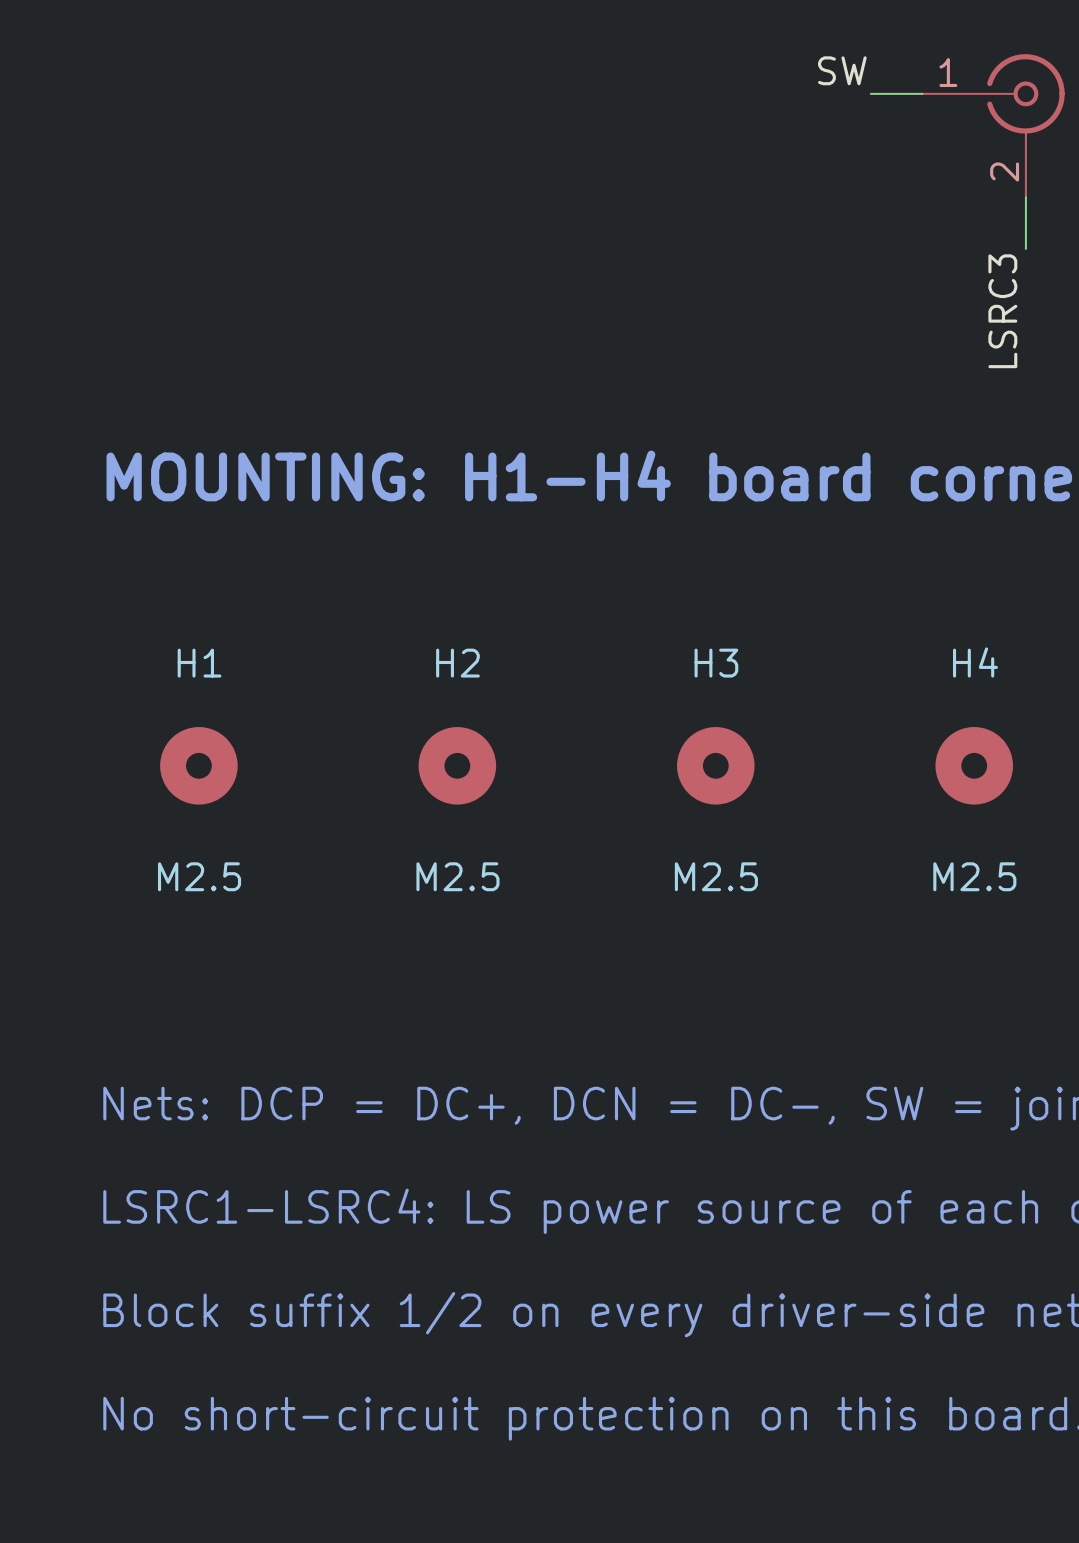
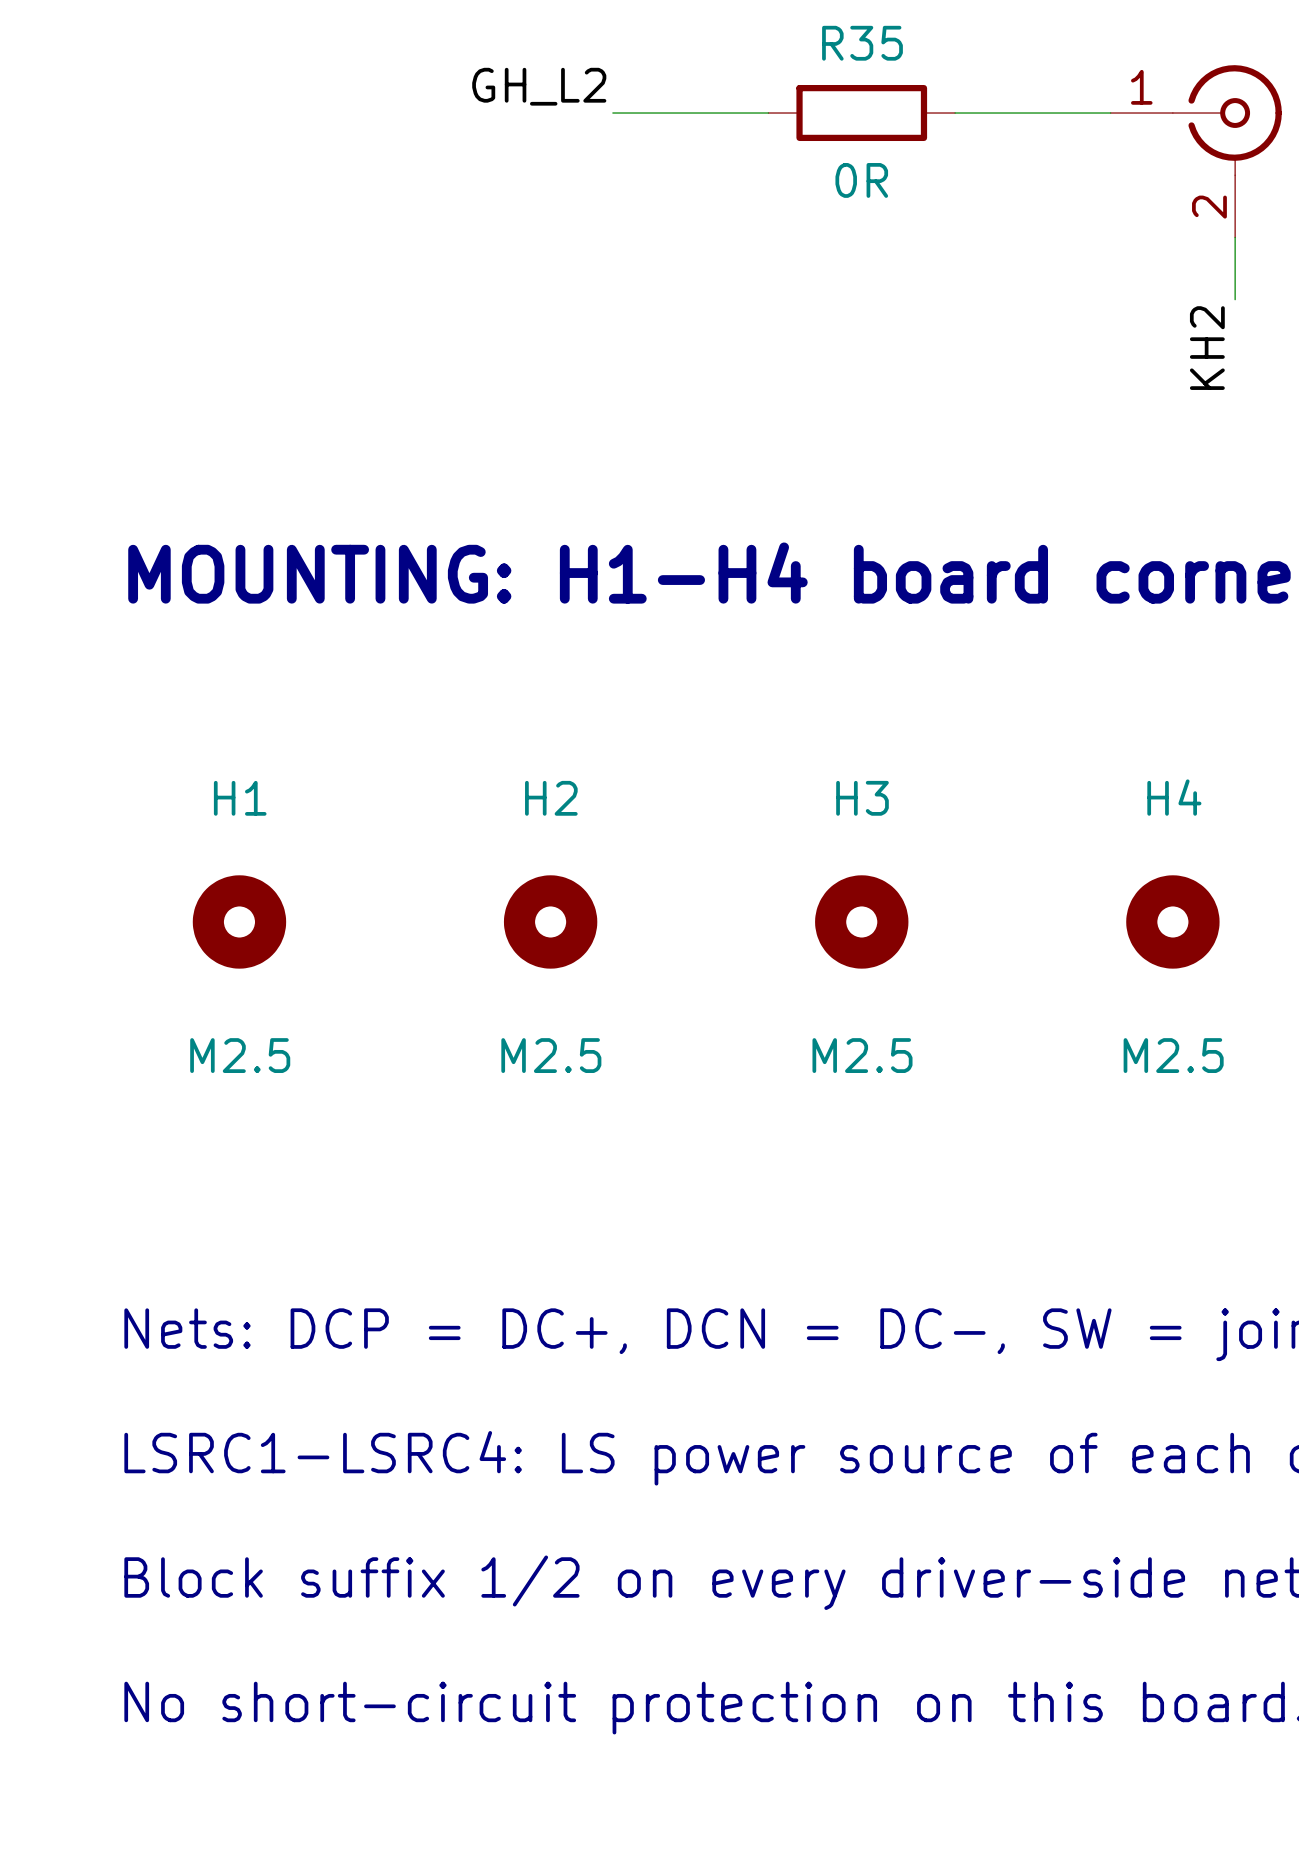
label: SW (842, 70) -> none
label: none -> GH_L2 (539, 86)
wire: none -> (612, 113) (768, 113)
R35: none -> 0R (861, 113)
wire: none -> (955, 113) (1048, 113)
label: LSRC3 (1002, 311) -> KH2 (1207, 348)

